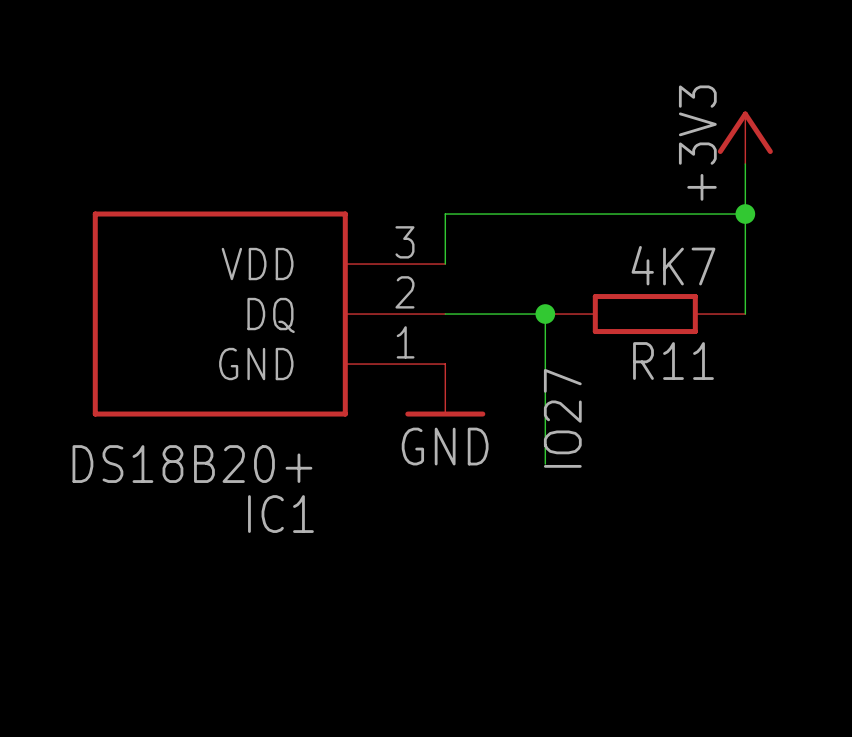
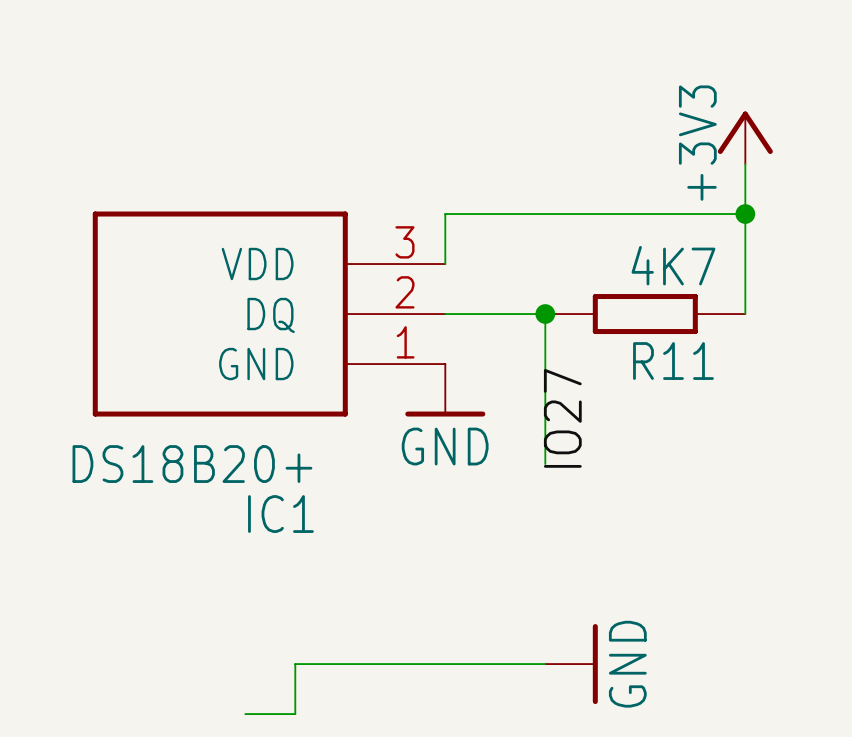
wire: none -> (545, 664) (295, 664) (295, 714) (245, 714)
power symbol: none -> GND (571, 664)

